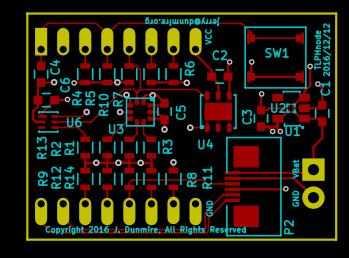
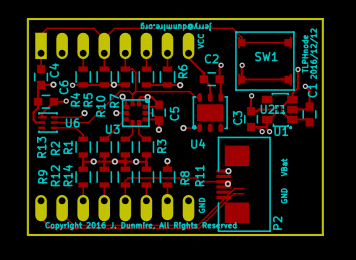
track: (322, 121) (322, 138) (313, 146) (313, 169) (310, 172) (232, 172) -> none
via: none -> (228, 171)
track: (232, 178) (294, 178) (313, 197) -> none
part: (313, 183) -> none
via: none -> (227, 183)
track: (285, 188) (232, 189) -> none
via: (285, 188) -> none
track: (232, 194) (223, 194) (205, 212) (205, 229) -> (243, 188) (234, 188) (197, 225)
track: (232, 200) (226, 200) (208, 218) (208, 230) -> (243, 193) (233, 193) (200, 226)

